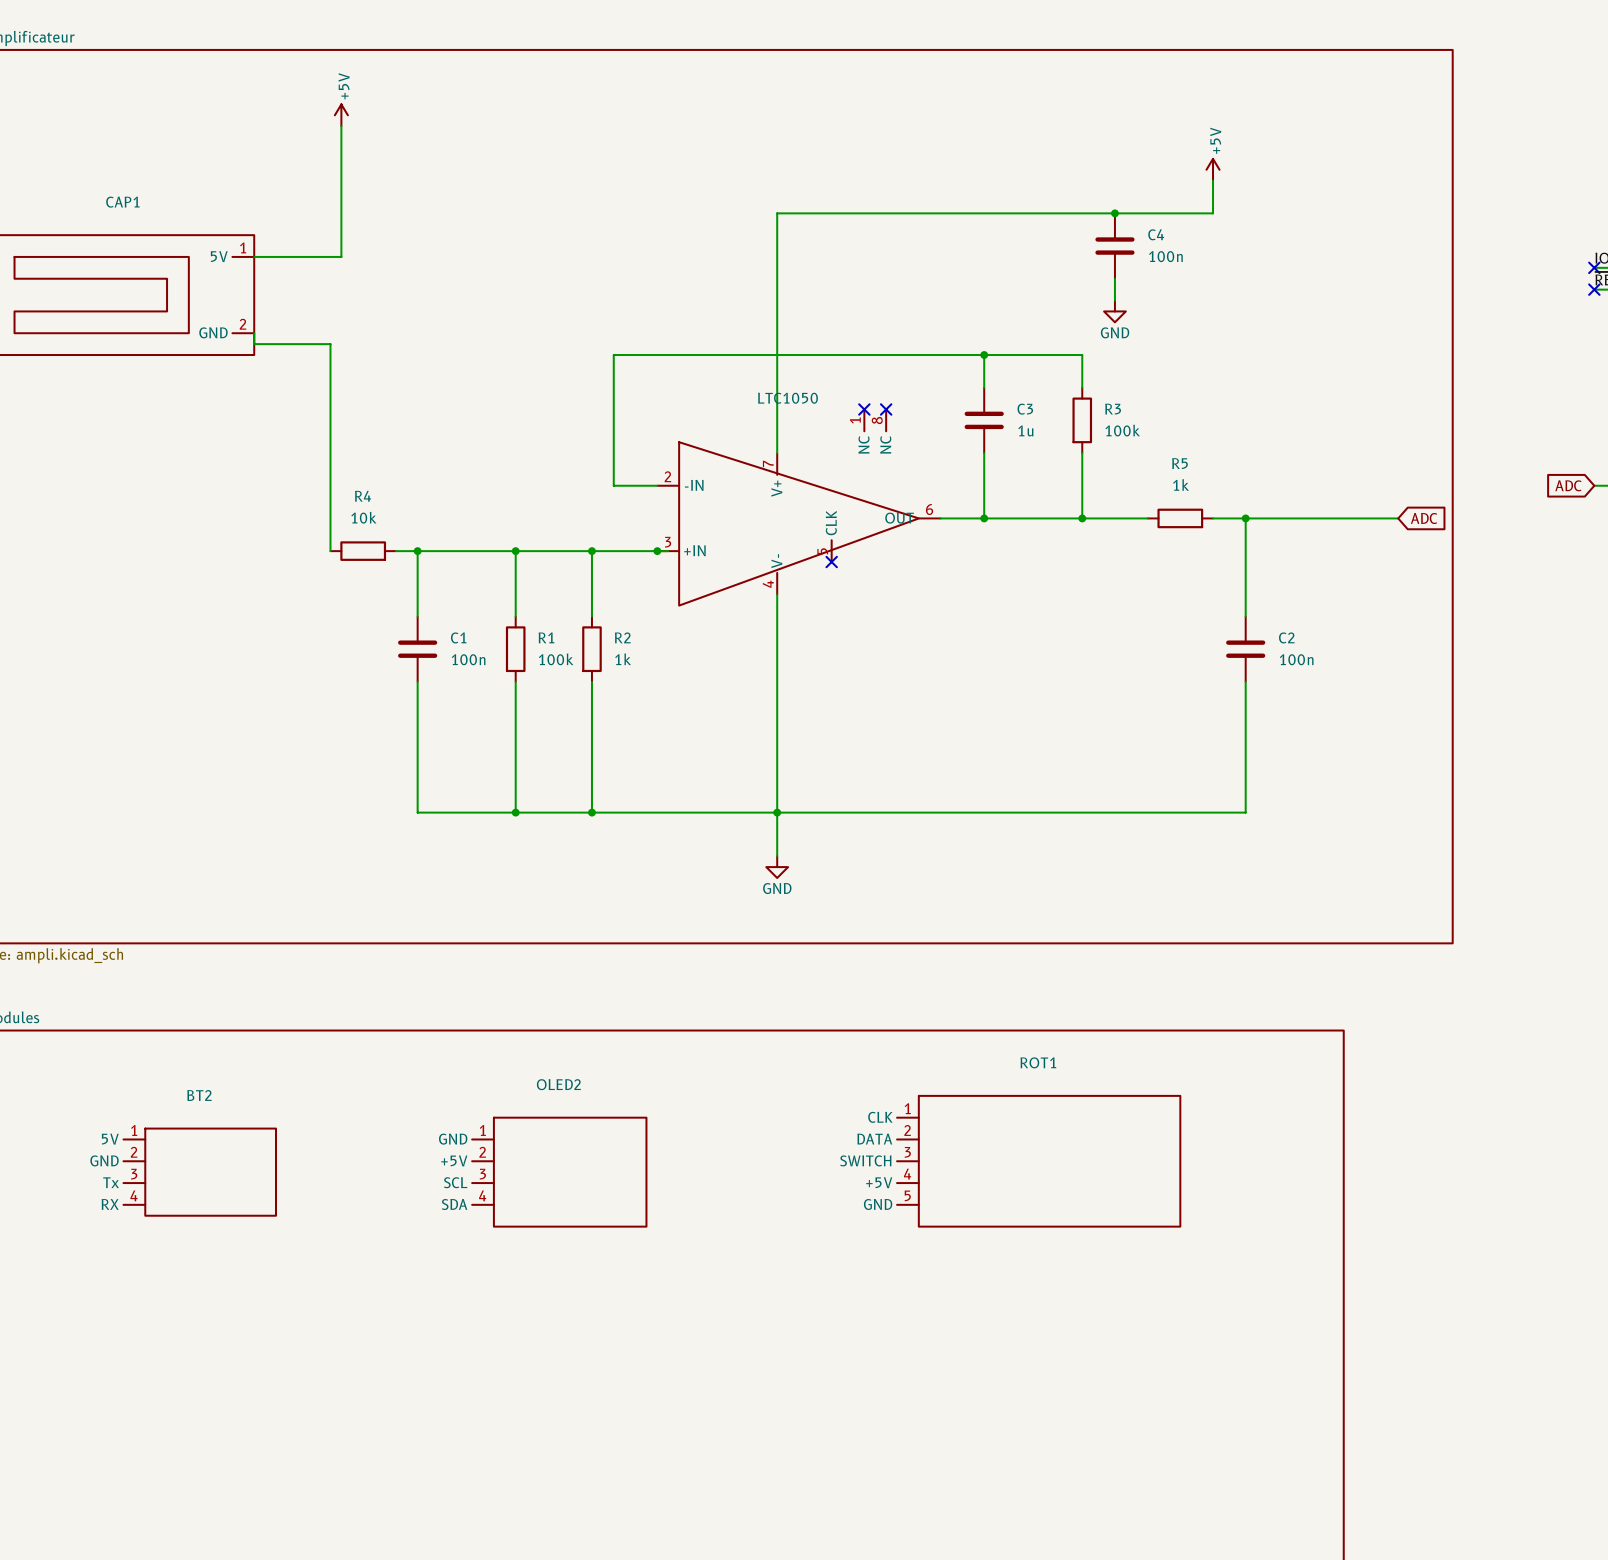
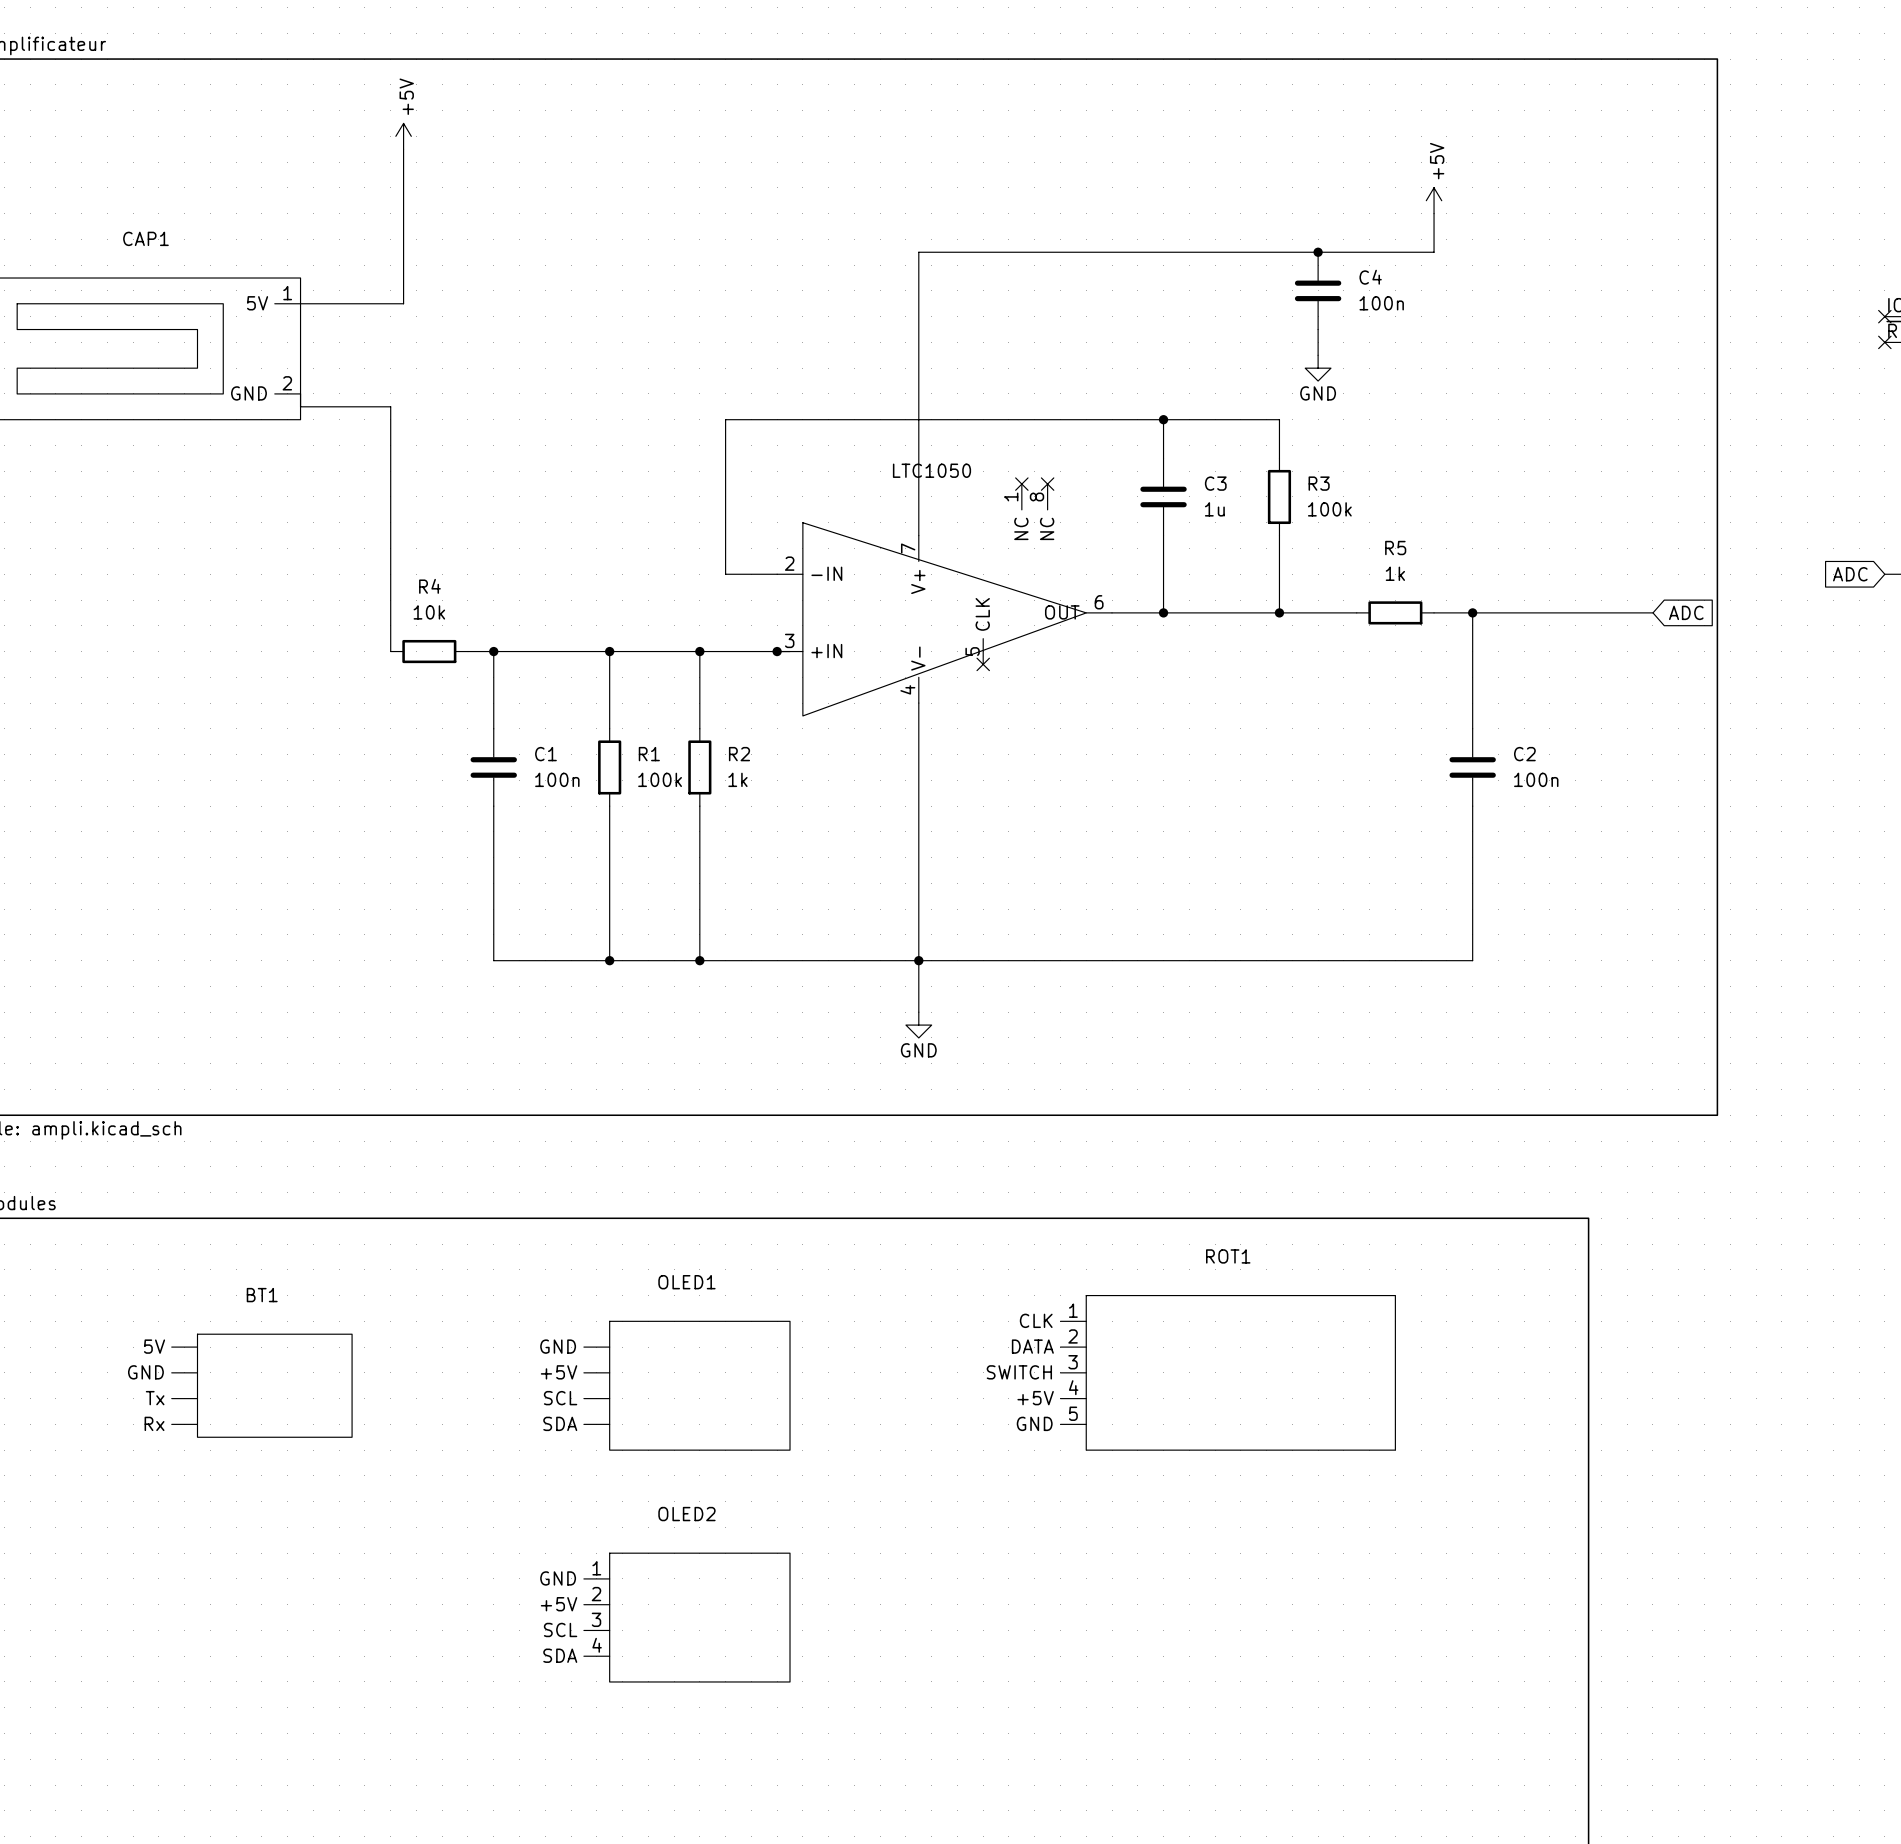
BT2: (199, 1172) -> none
BT1: none -> (261, 1385)
OLED2 position: (559, 1172) -> (686, 1617)
OLED1: none -> (686, 1385)

